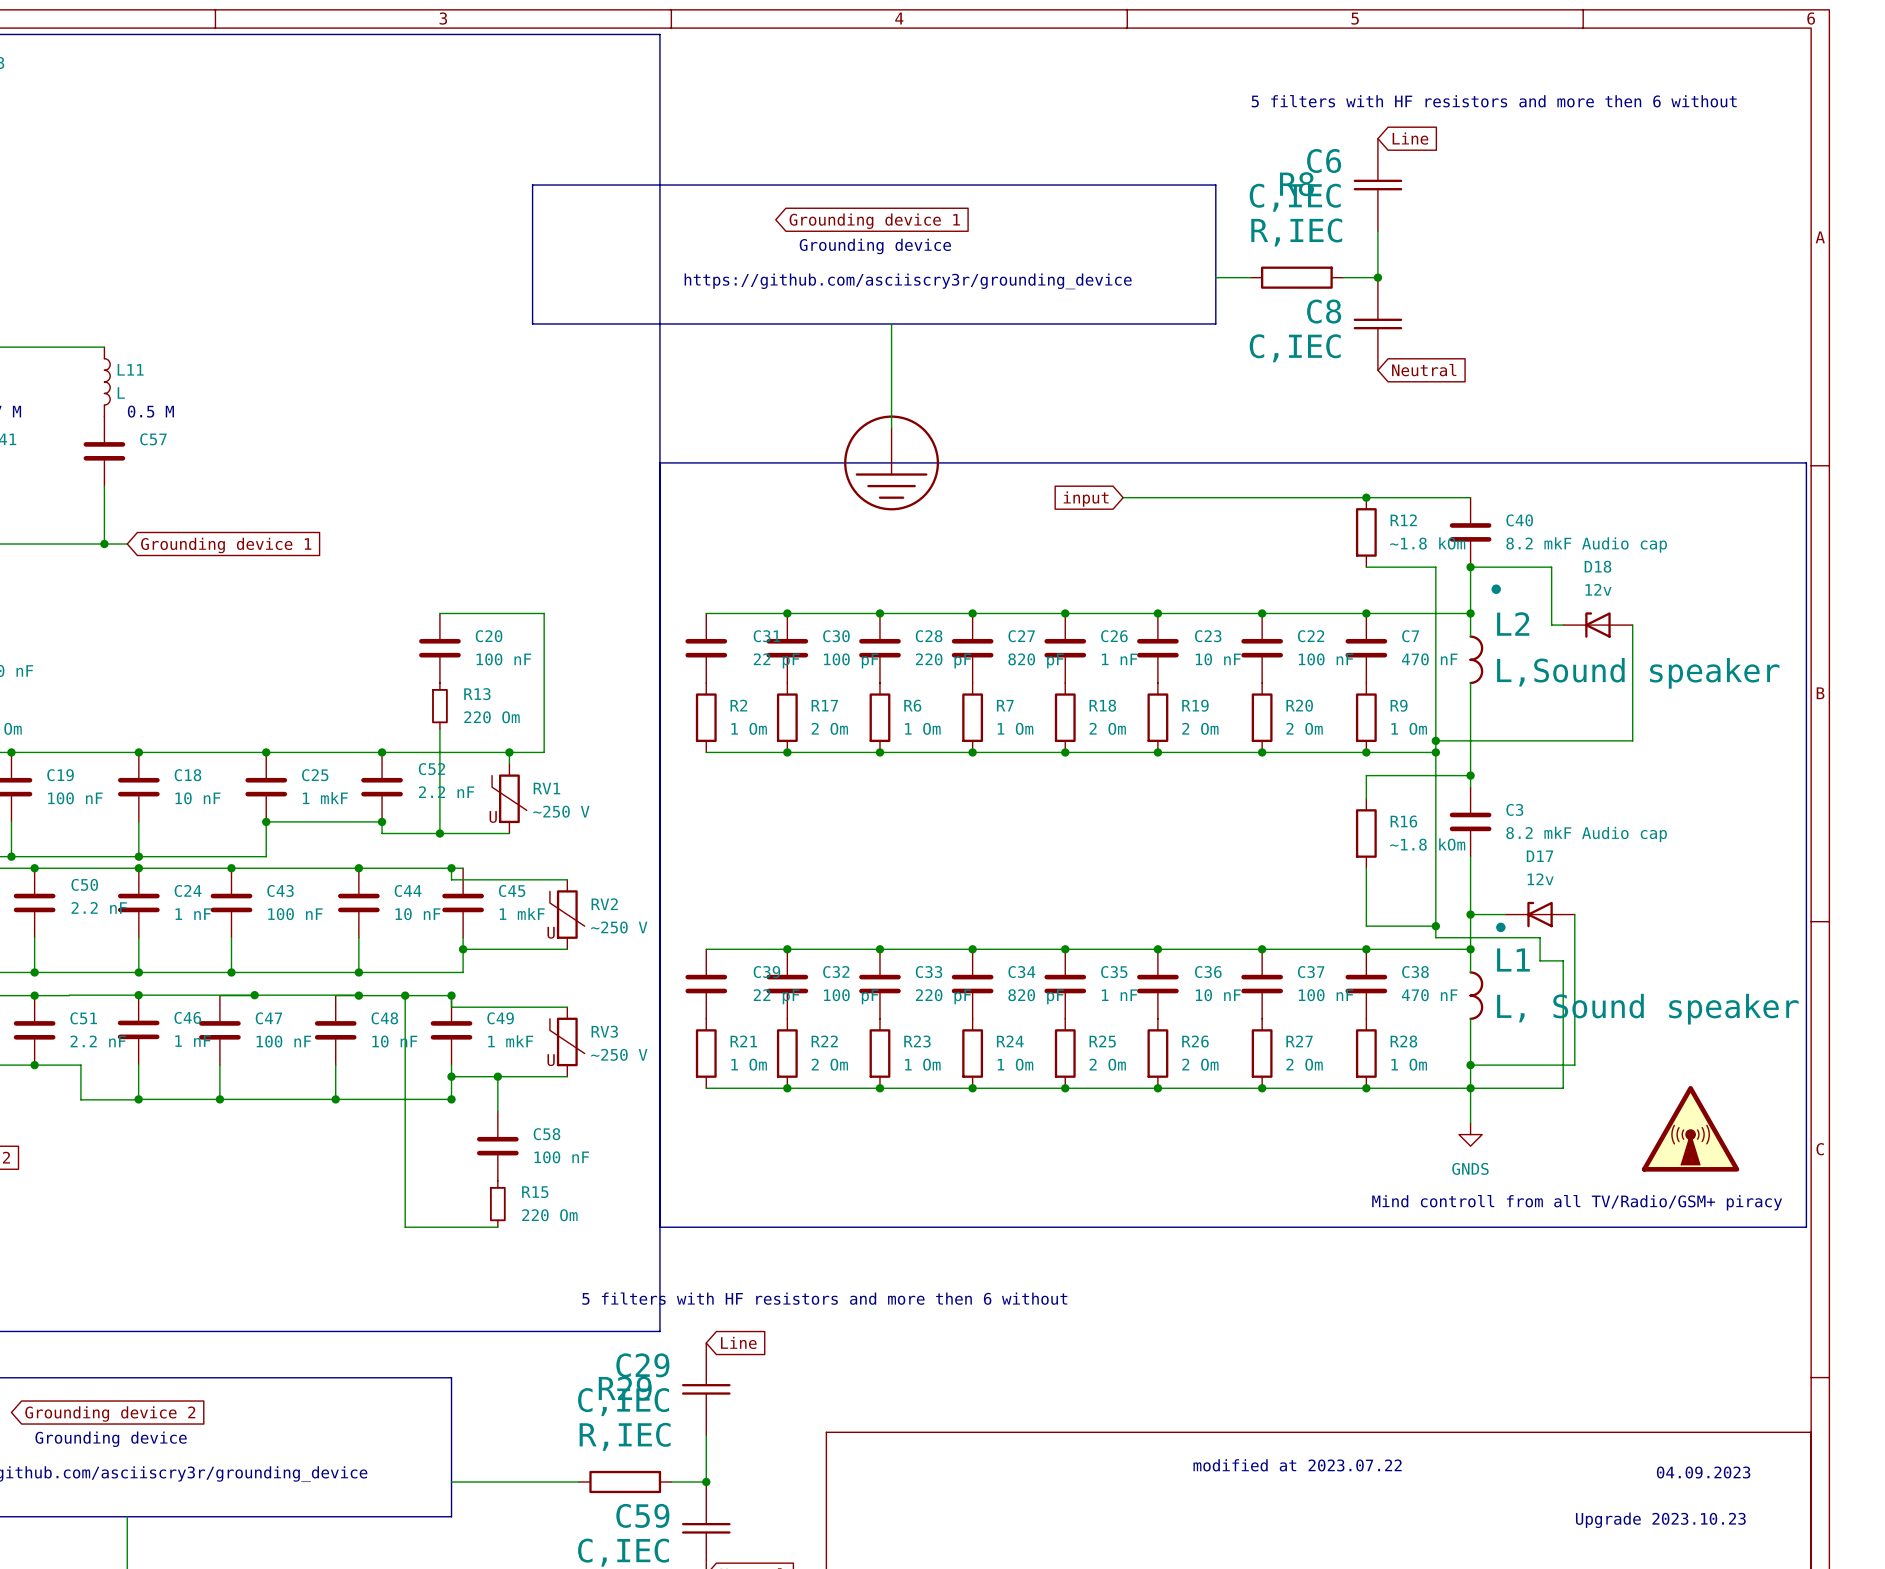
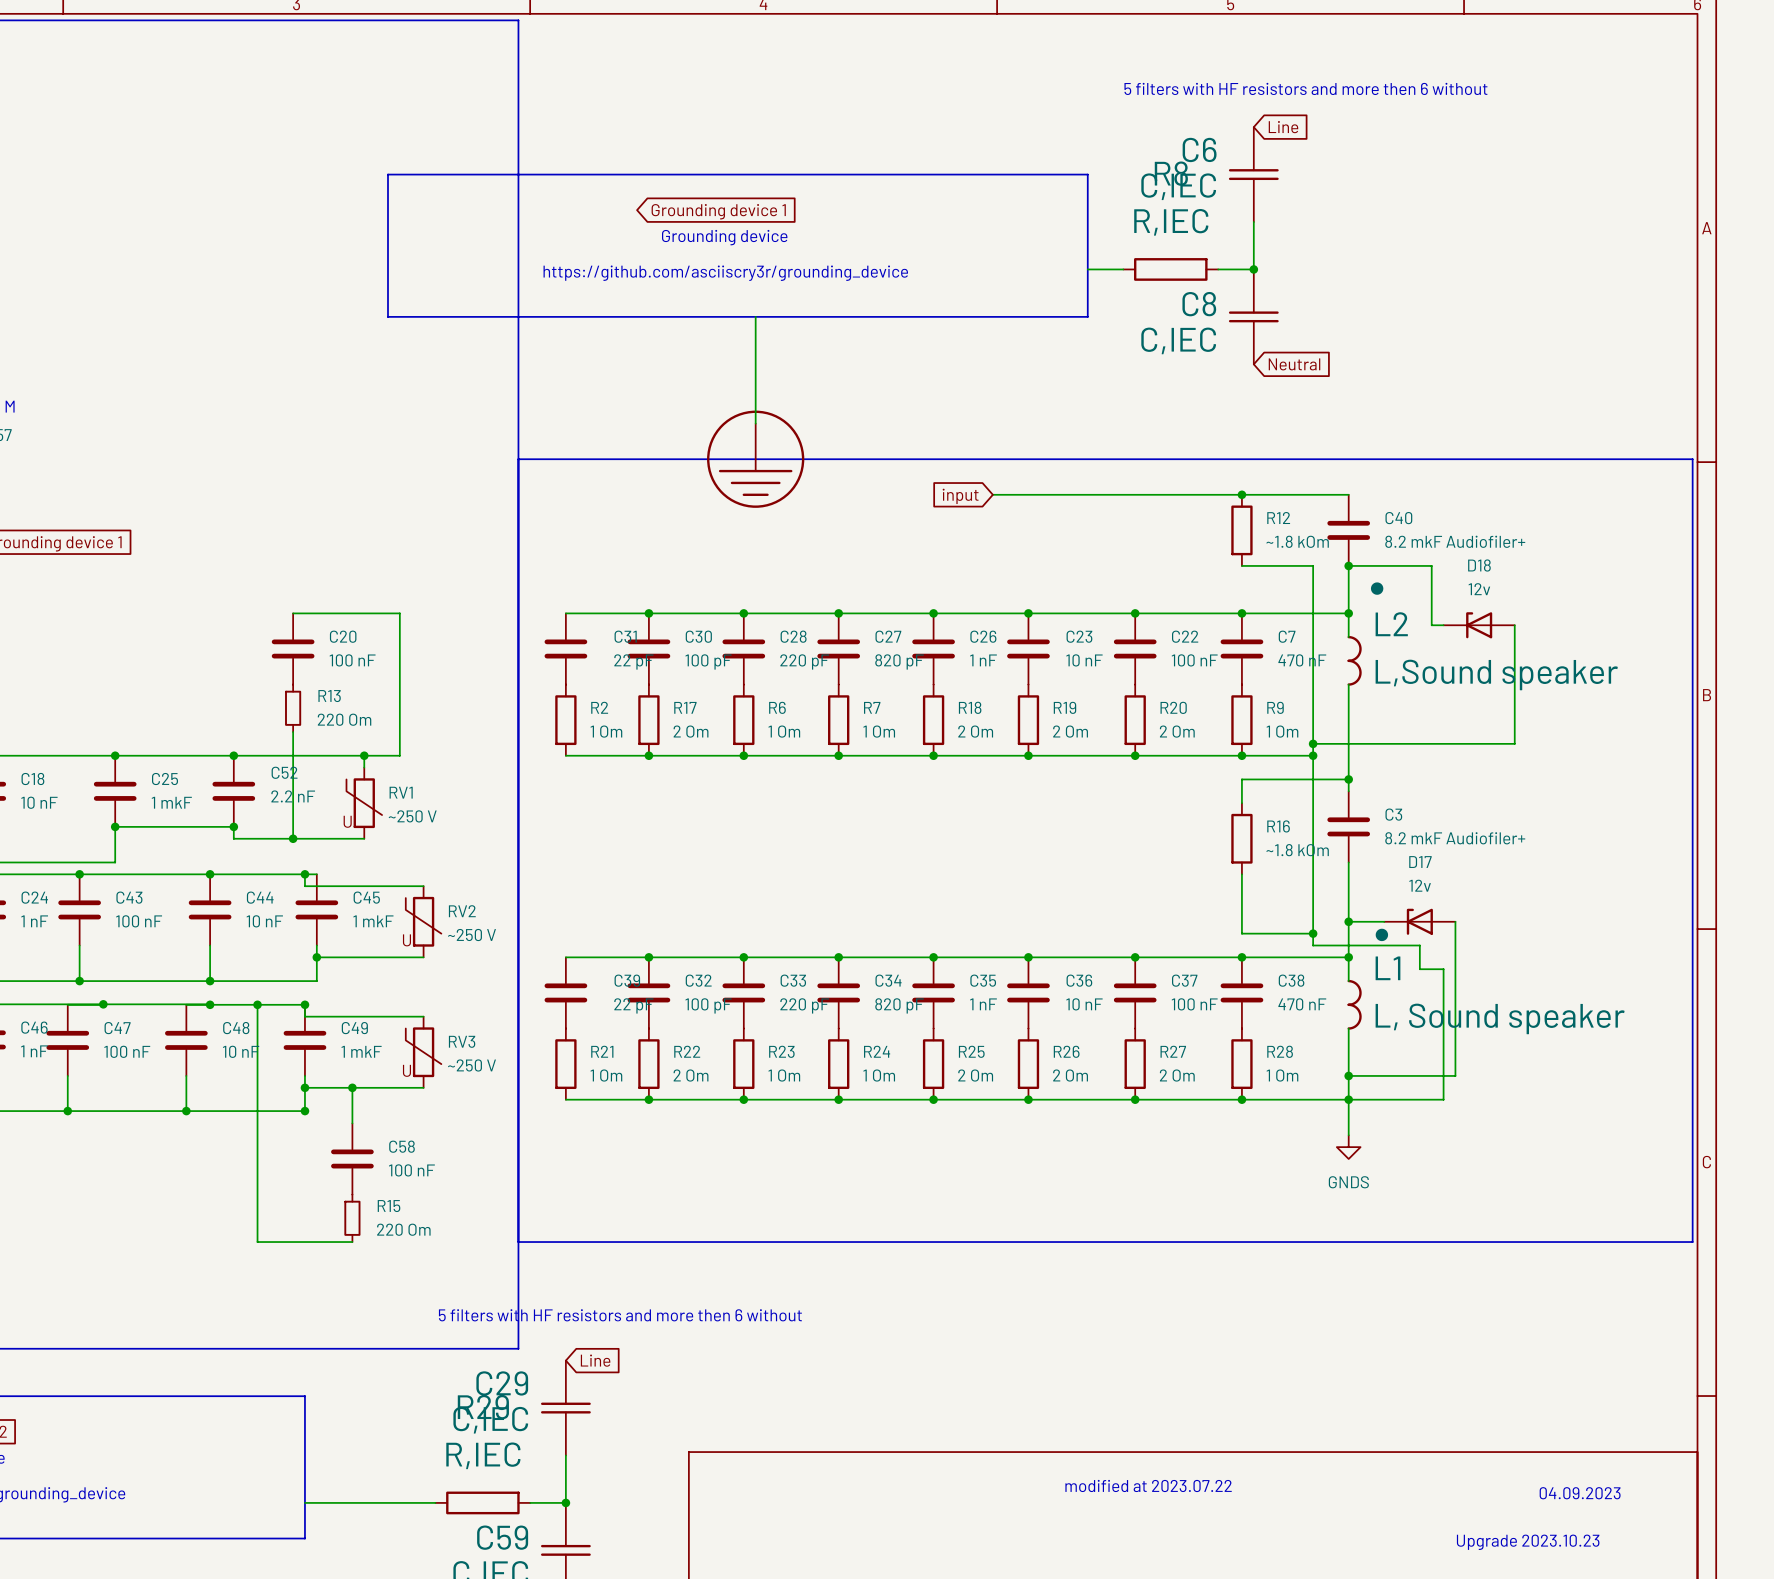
C40 value: 8.2 mkF Audio cap (1586, 544) -> 8.2 mkF Audiofiler+ (1455, 541)
C3 value: 8.2 mkF Audio cap (1586, 834) -> 8.2 mkF Audiofiler+ (1455, 838)
power symbol: (1690, 1128) -> none
text: Mind controll from all TV/Radio/GSM+ piracy (1577, 1202) -> none

